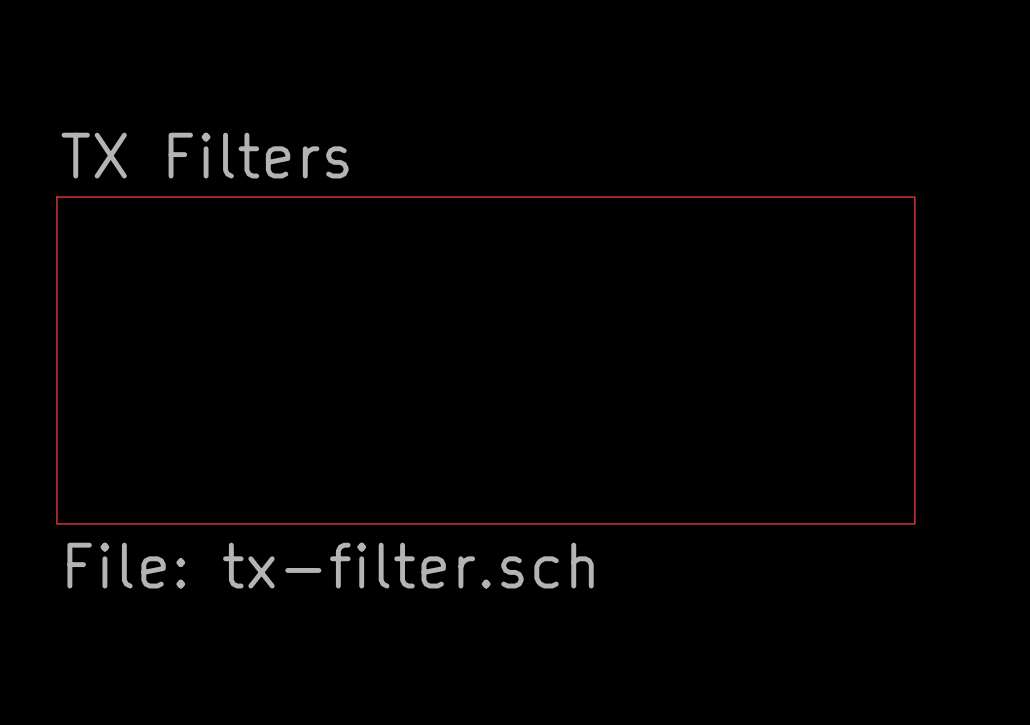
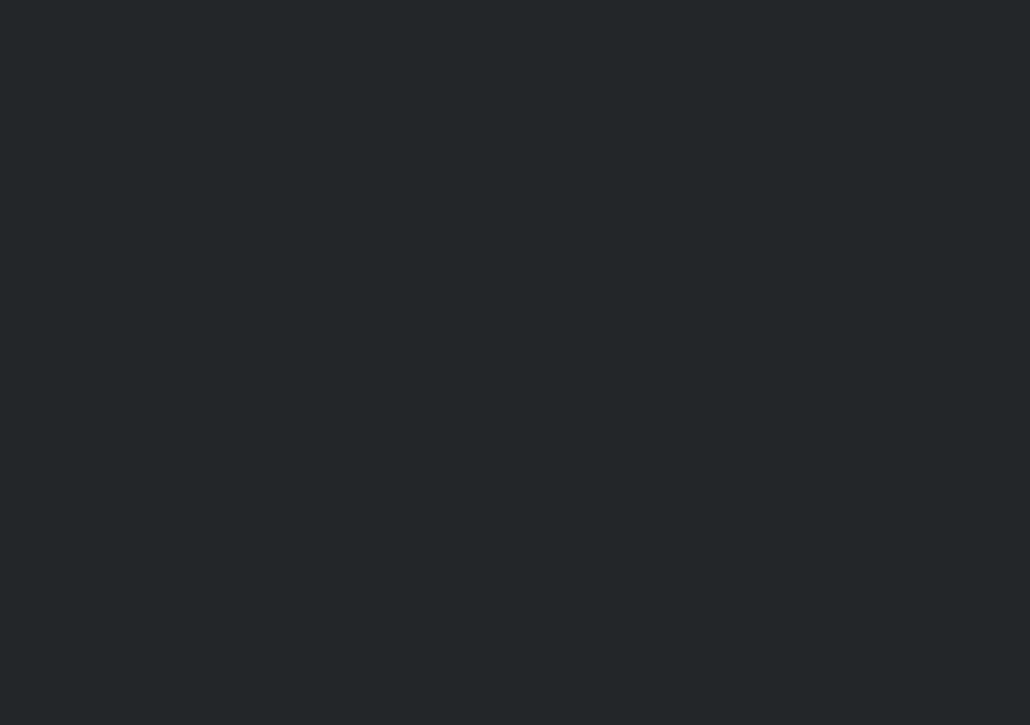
sheet TX Filters: File: tx-filter.sch (485, 360) -> none

